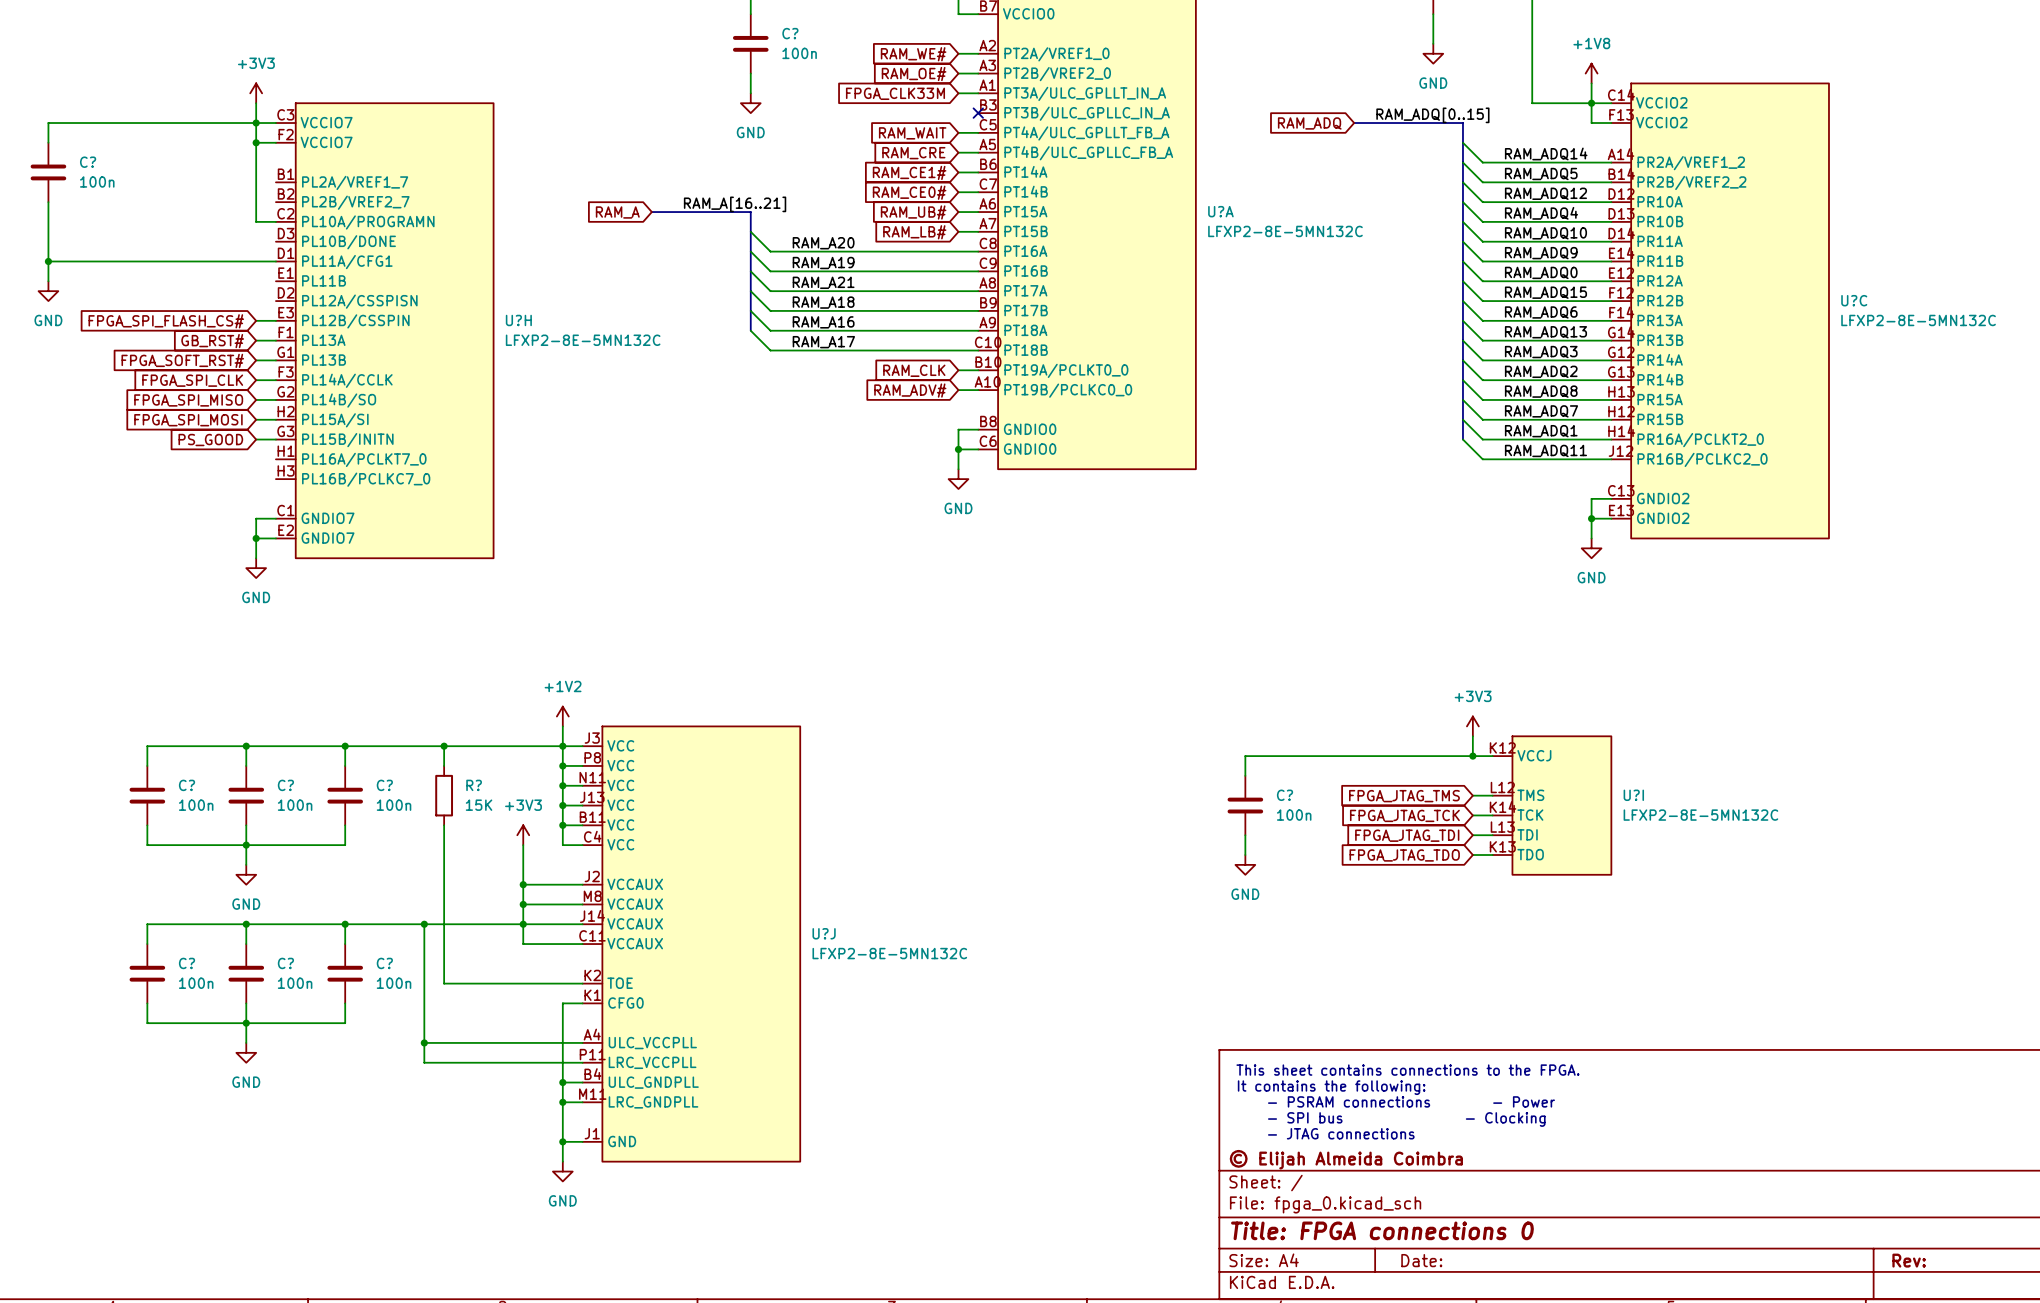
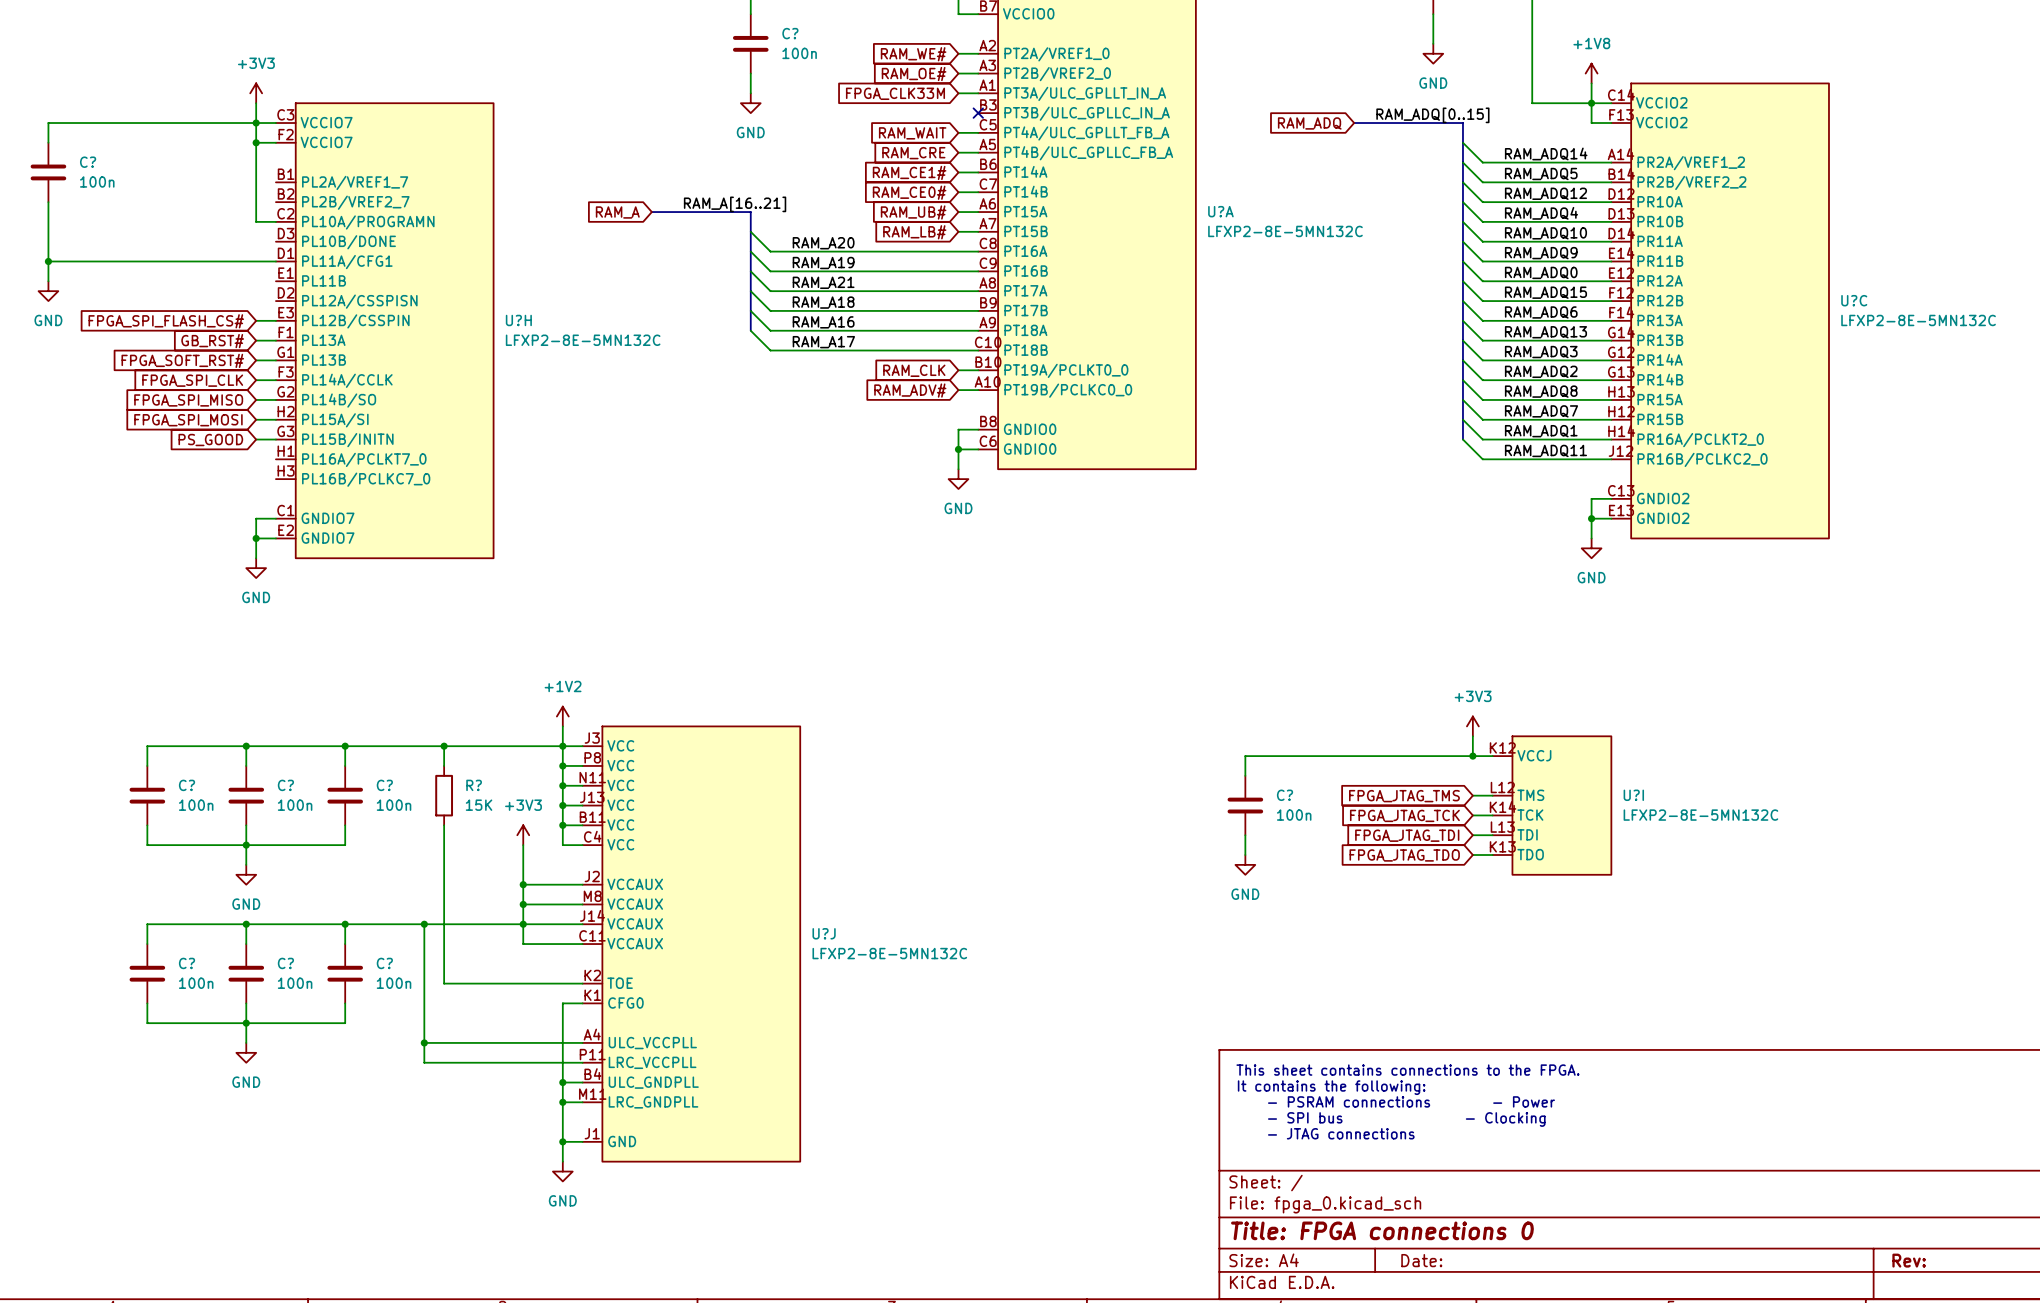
title block: © Elijah Almeida Coimbra (1346, 1159) -> none

